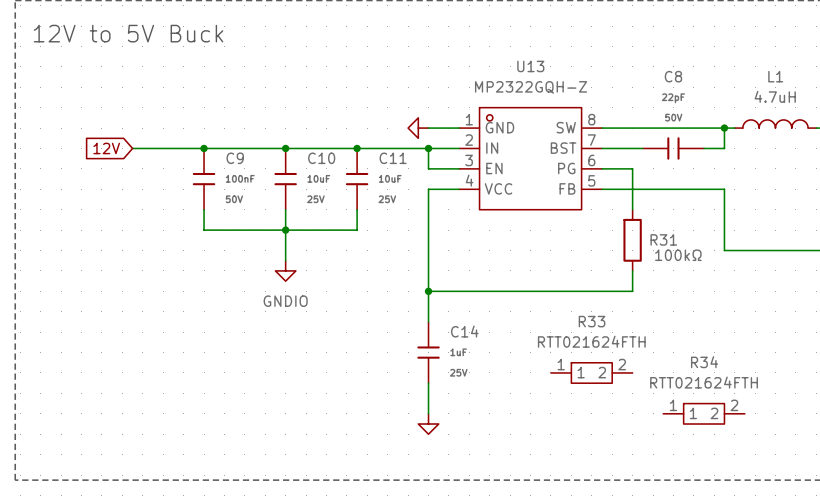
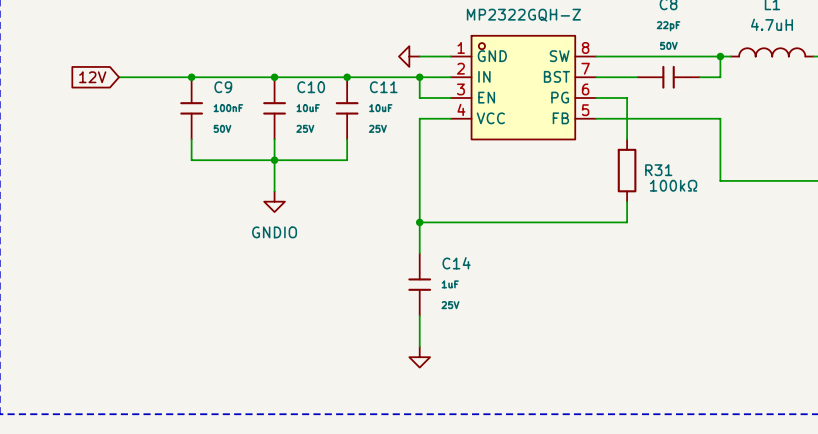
R33: RTT021624FTH (591, 372) -> none
R34: RTT021624FTH (704, 413) -> none

